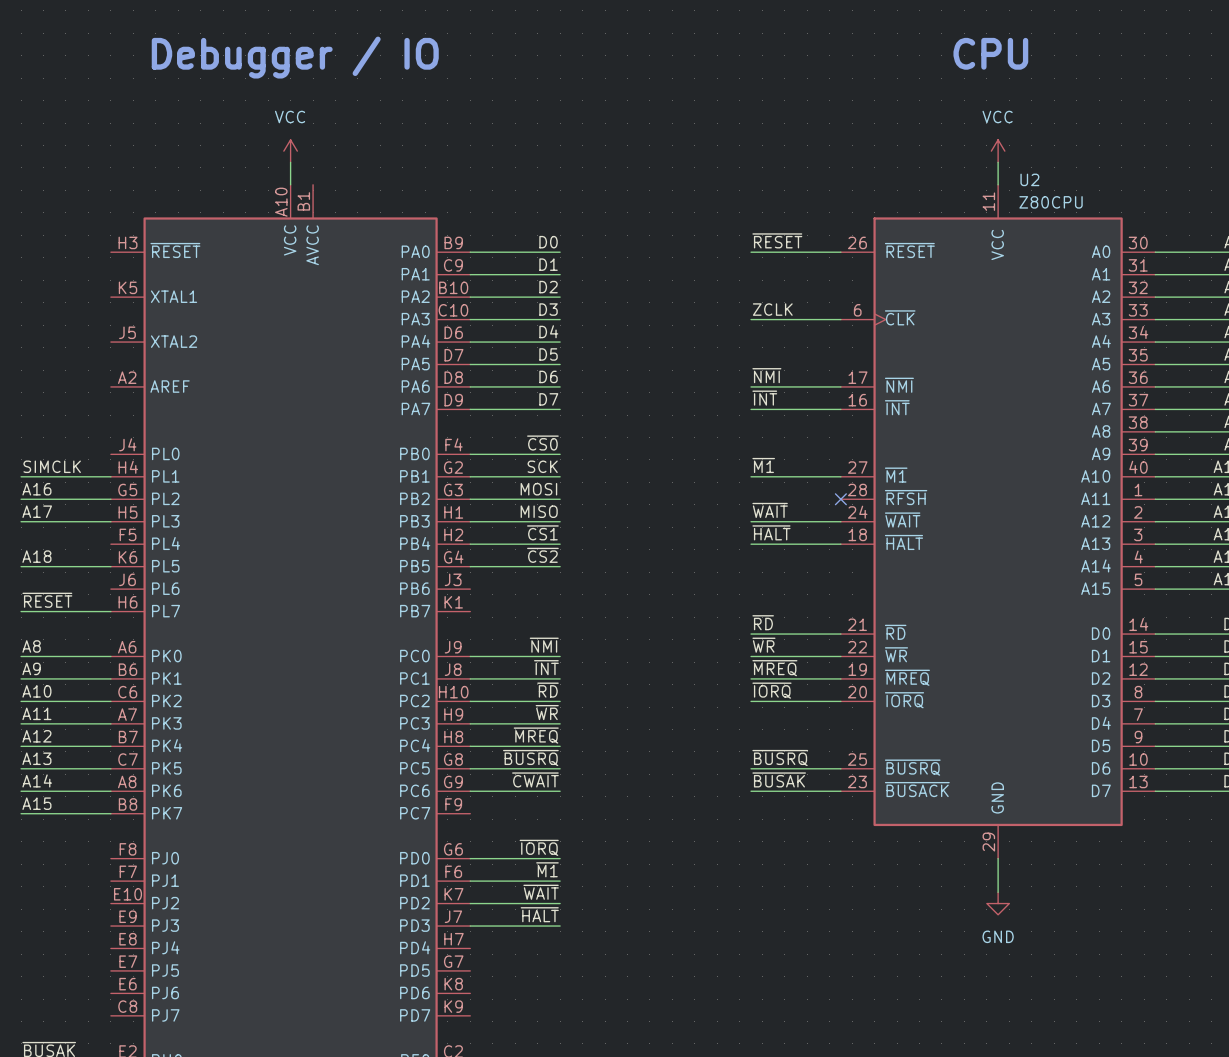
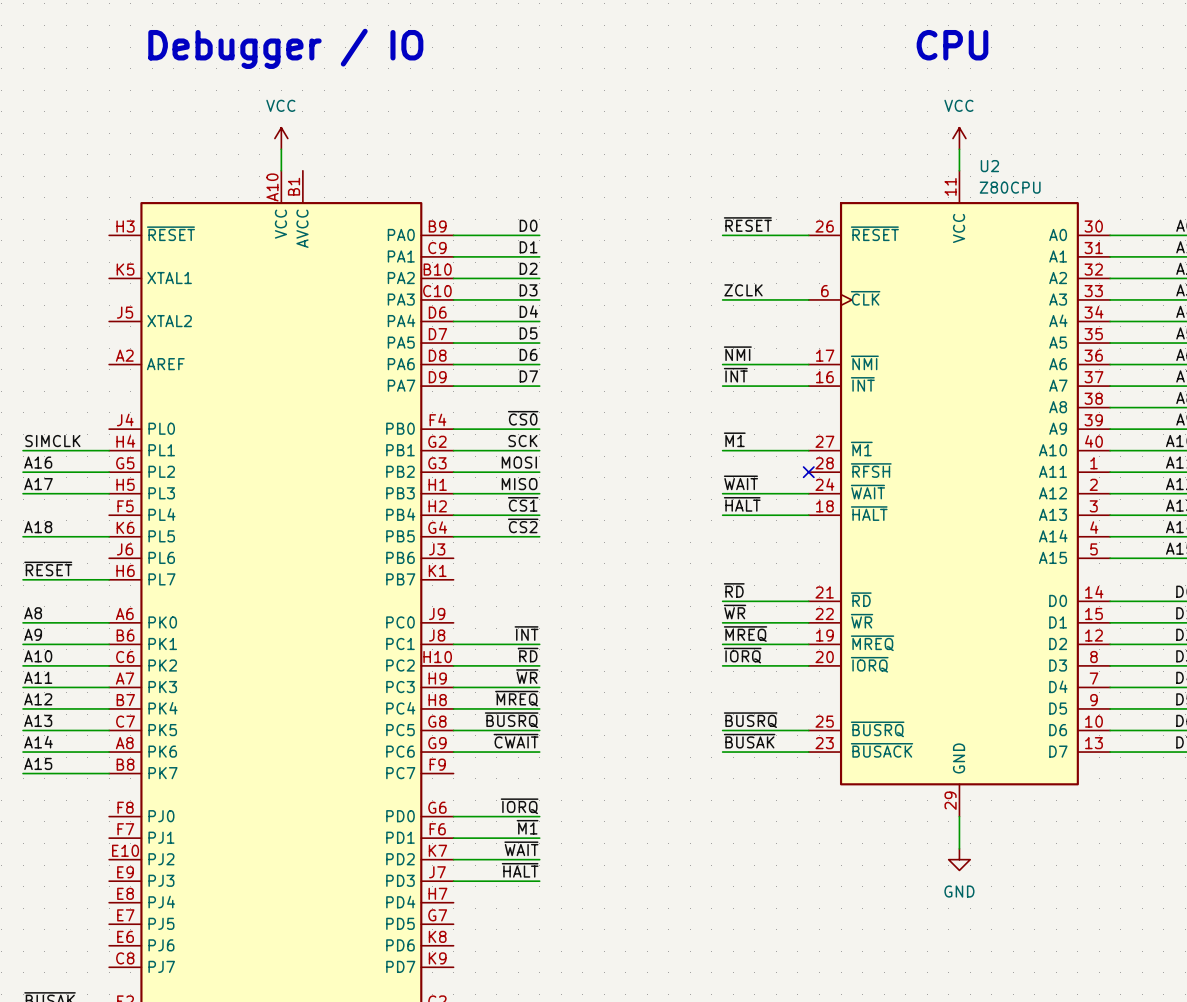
label: ~{NMI} (544, 645) -> none
wire: (470, 656) (560, 656) -> none

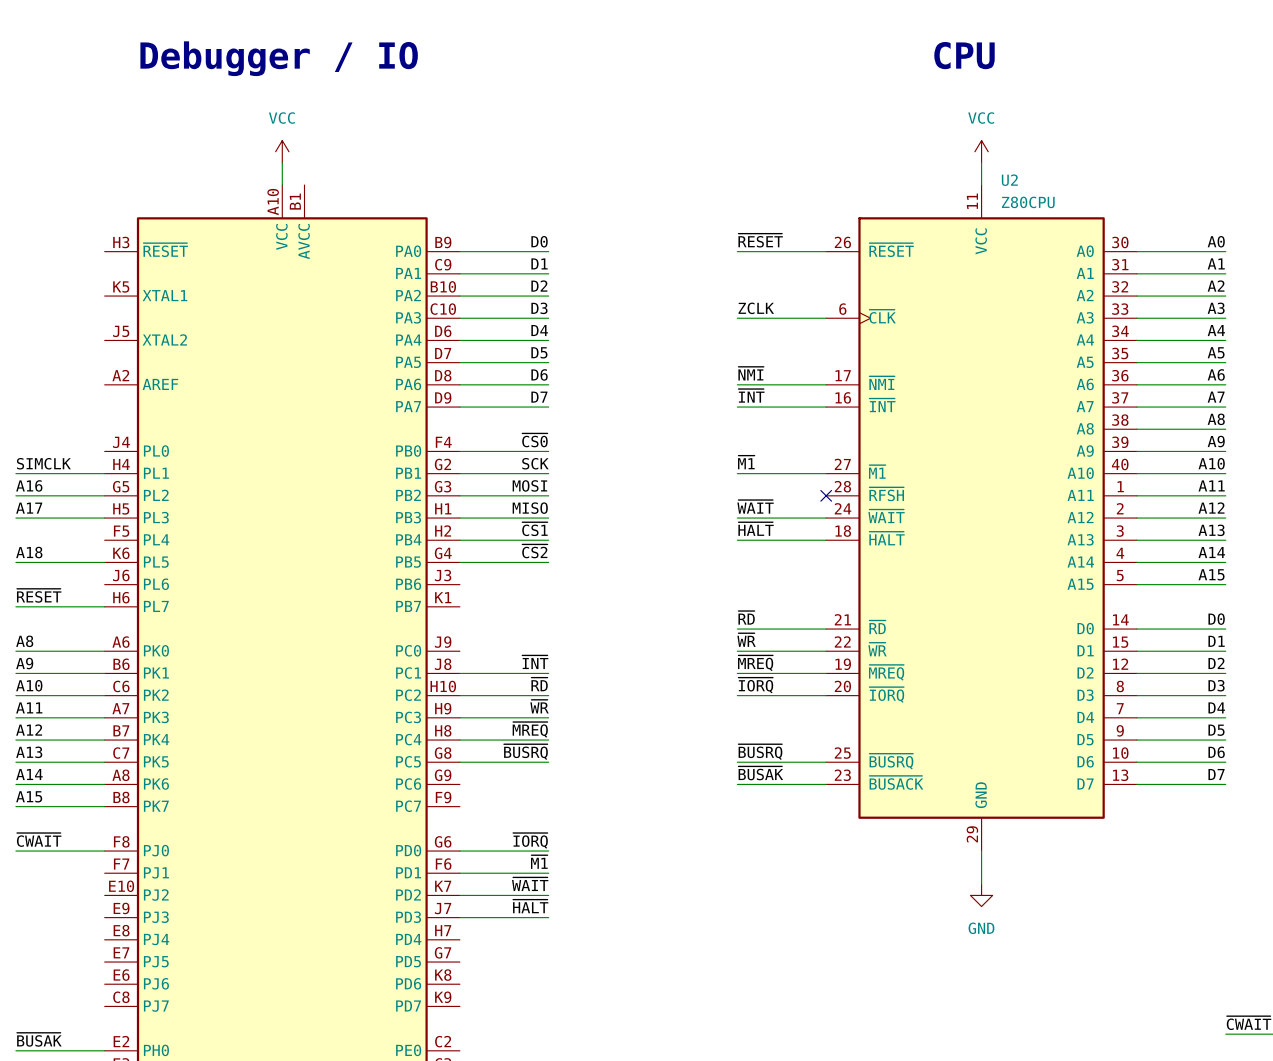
label: ~{CWAIT} (516, 741) -> none
wire: (453, 752) (539, 752) -> none
label: none -> ~{CWAIT} (39, 839)
wire: none -> (15, 851) (104, 851)

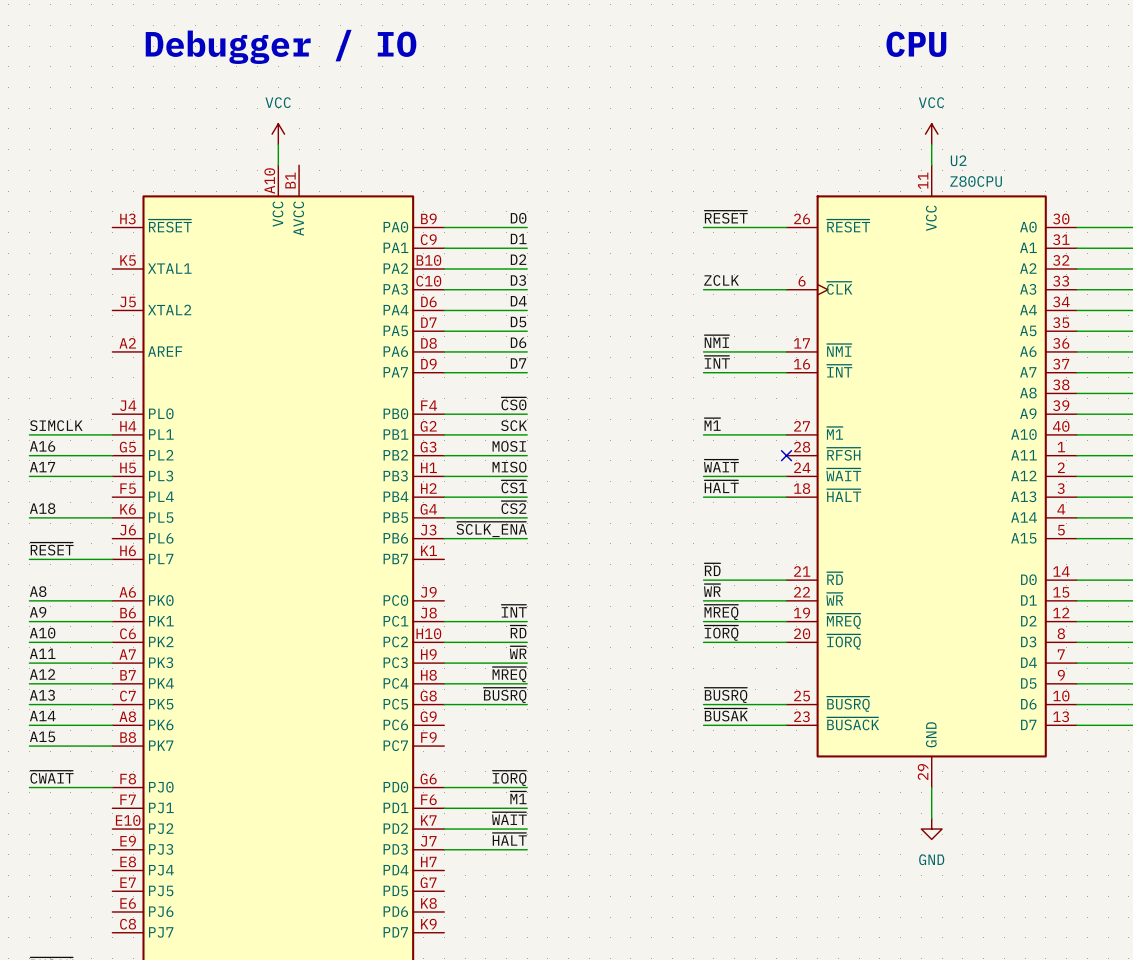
label: none -> ~{SCLK_ENA} (491, 529)
wire: none -> (444, 538) (527, 538)

